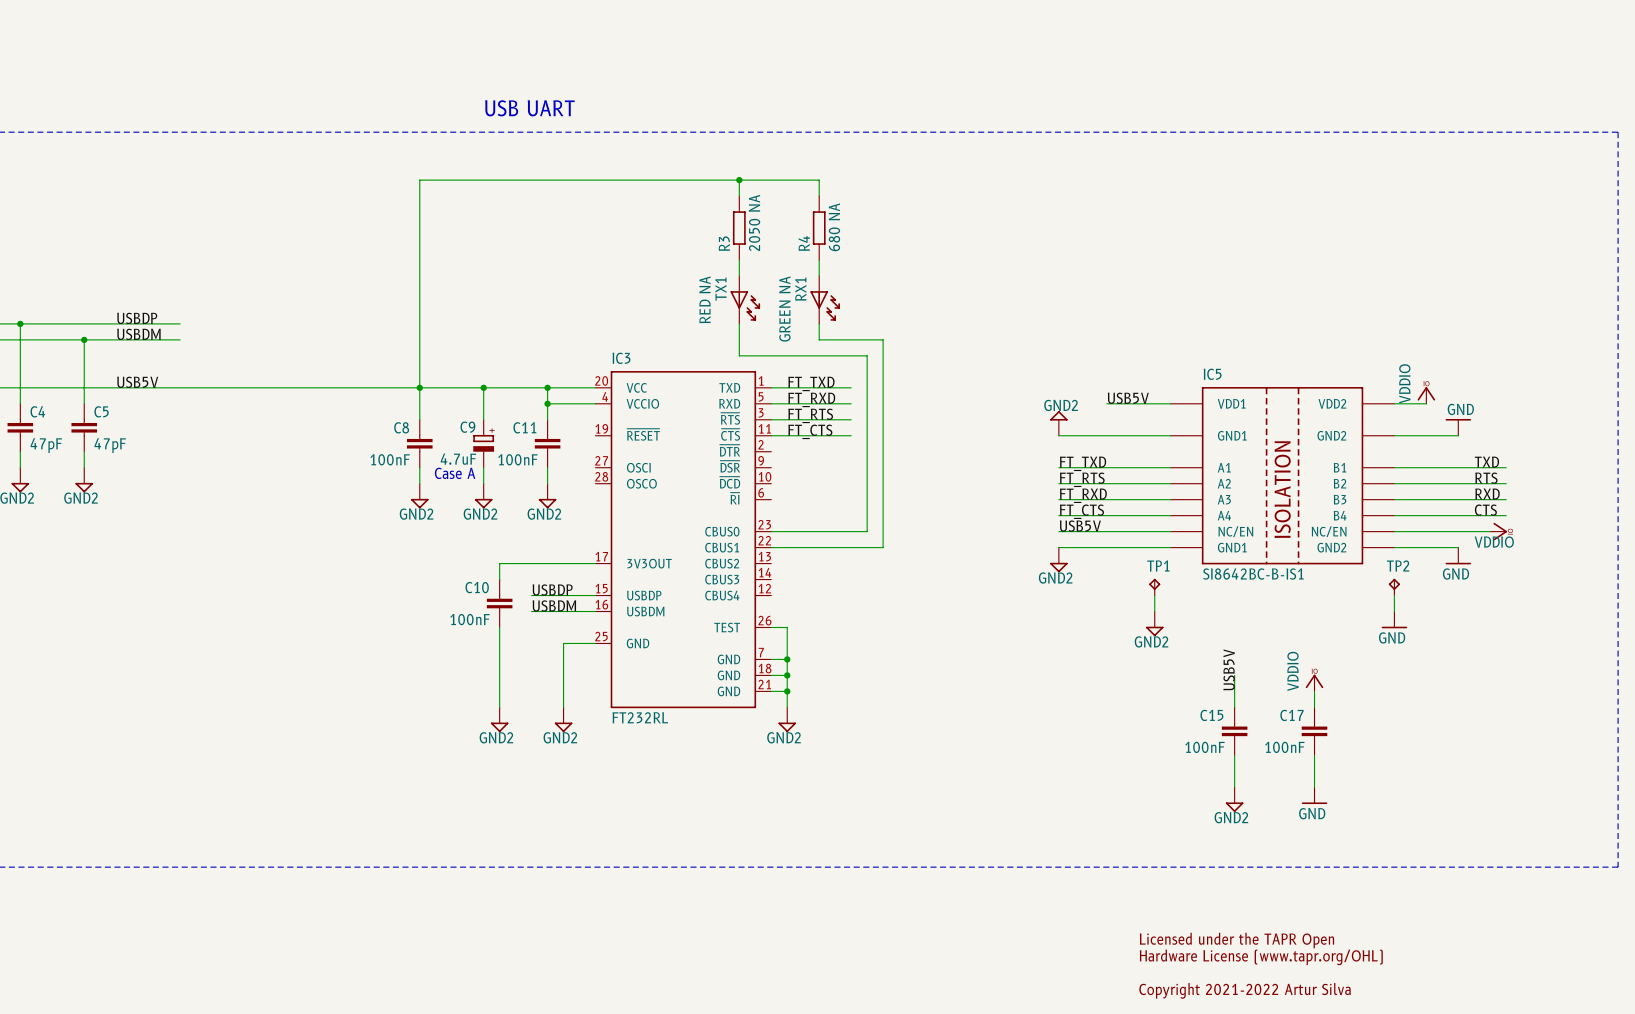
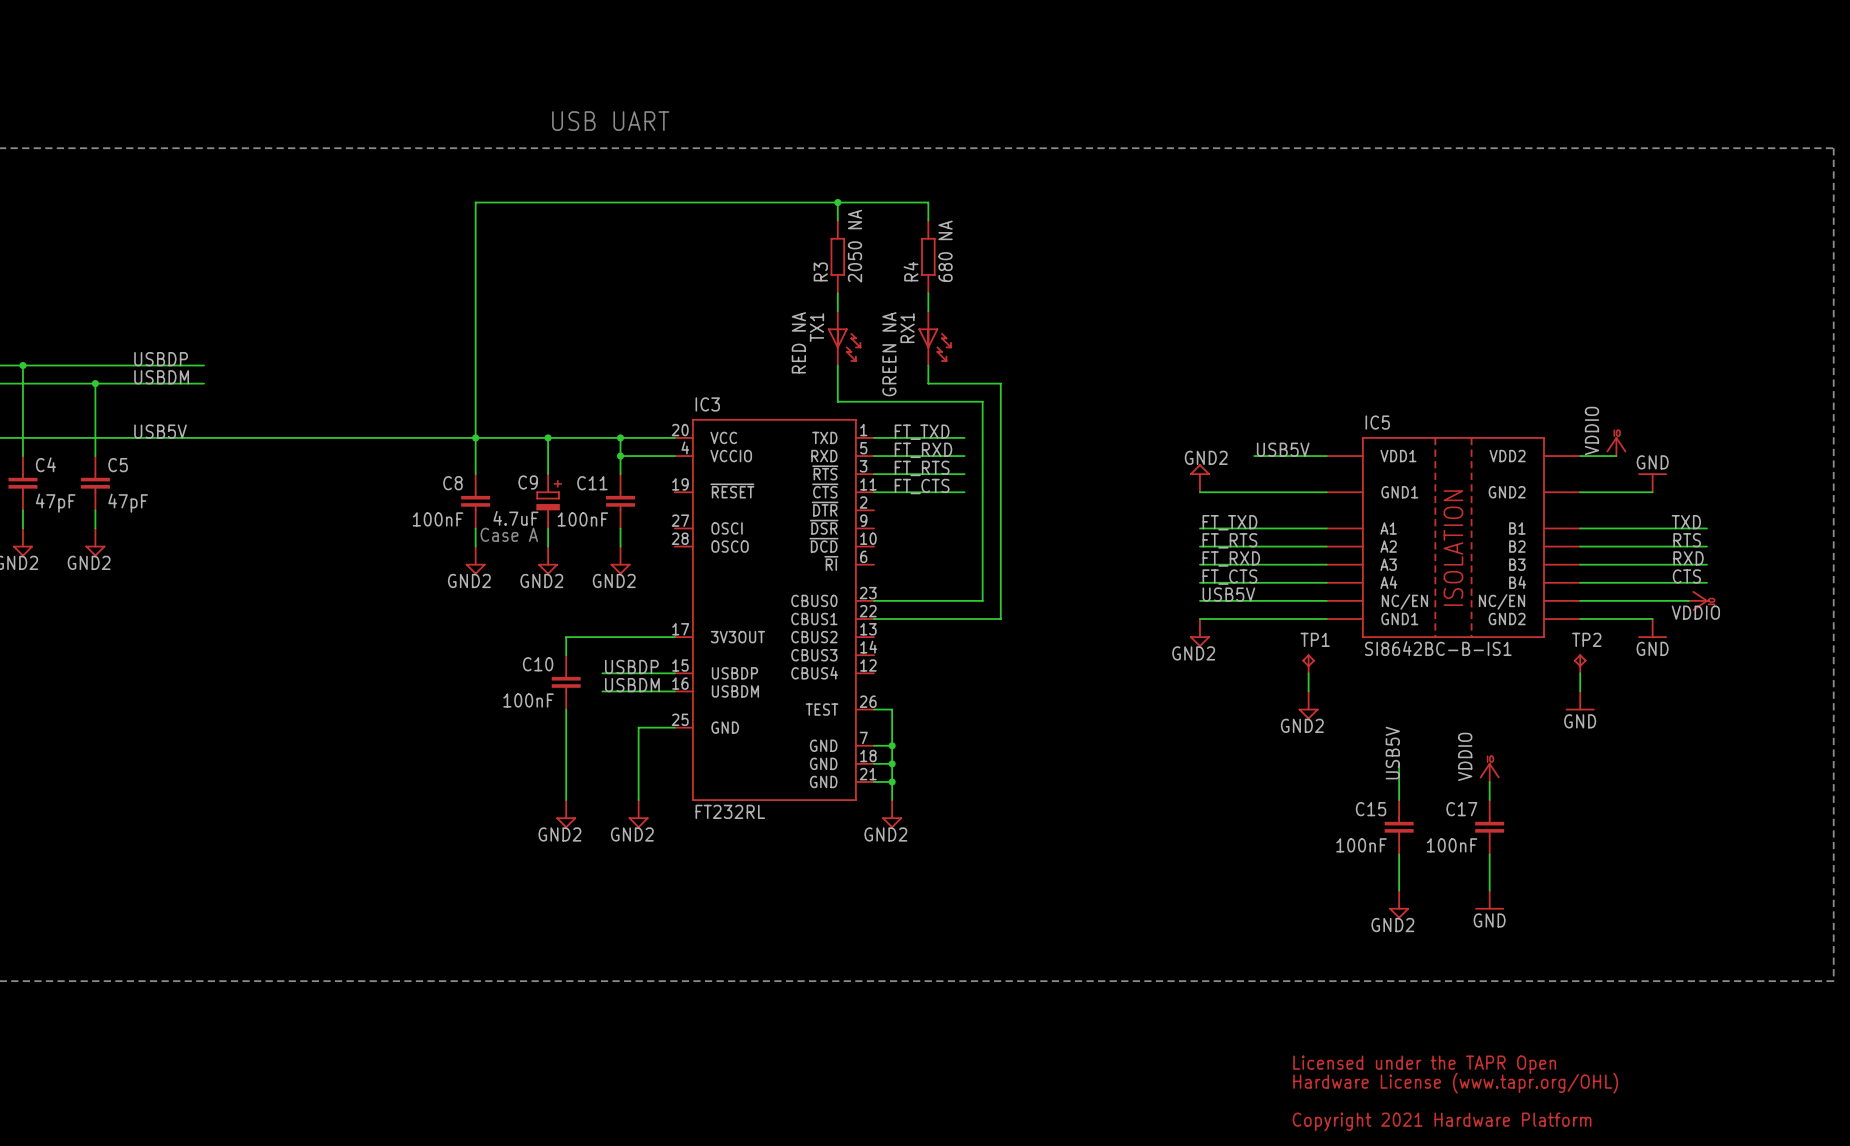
text: Copyright 2021-2022 Artur Silva (1245, 990) -> Copyright 2021 Hardware Platform (1442, 1121)

